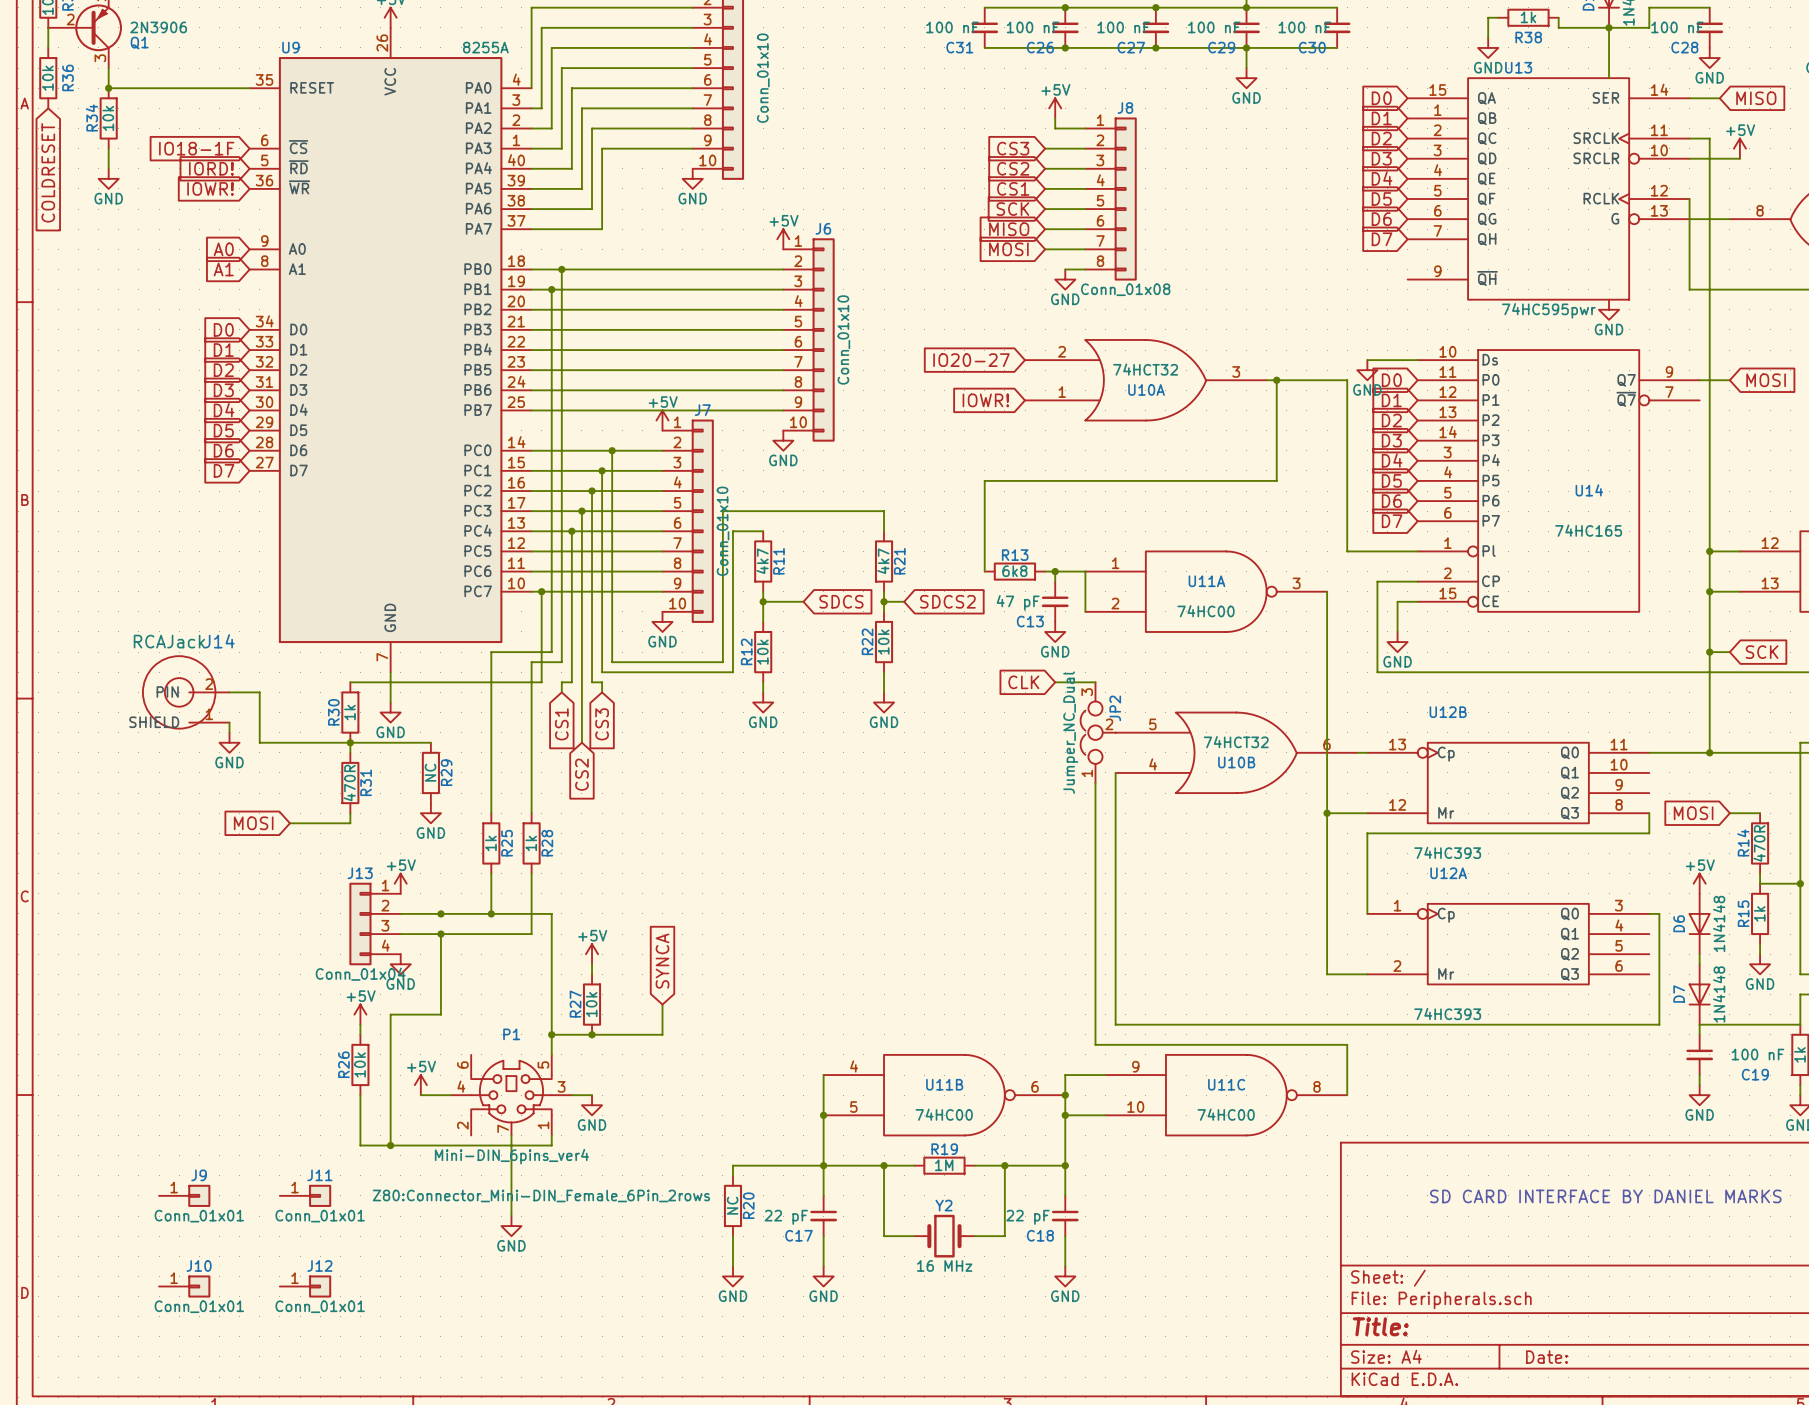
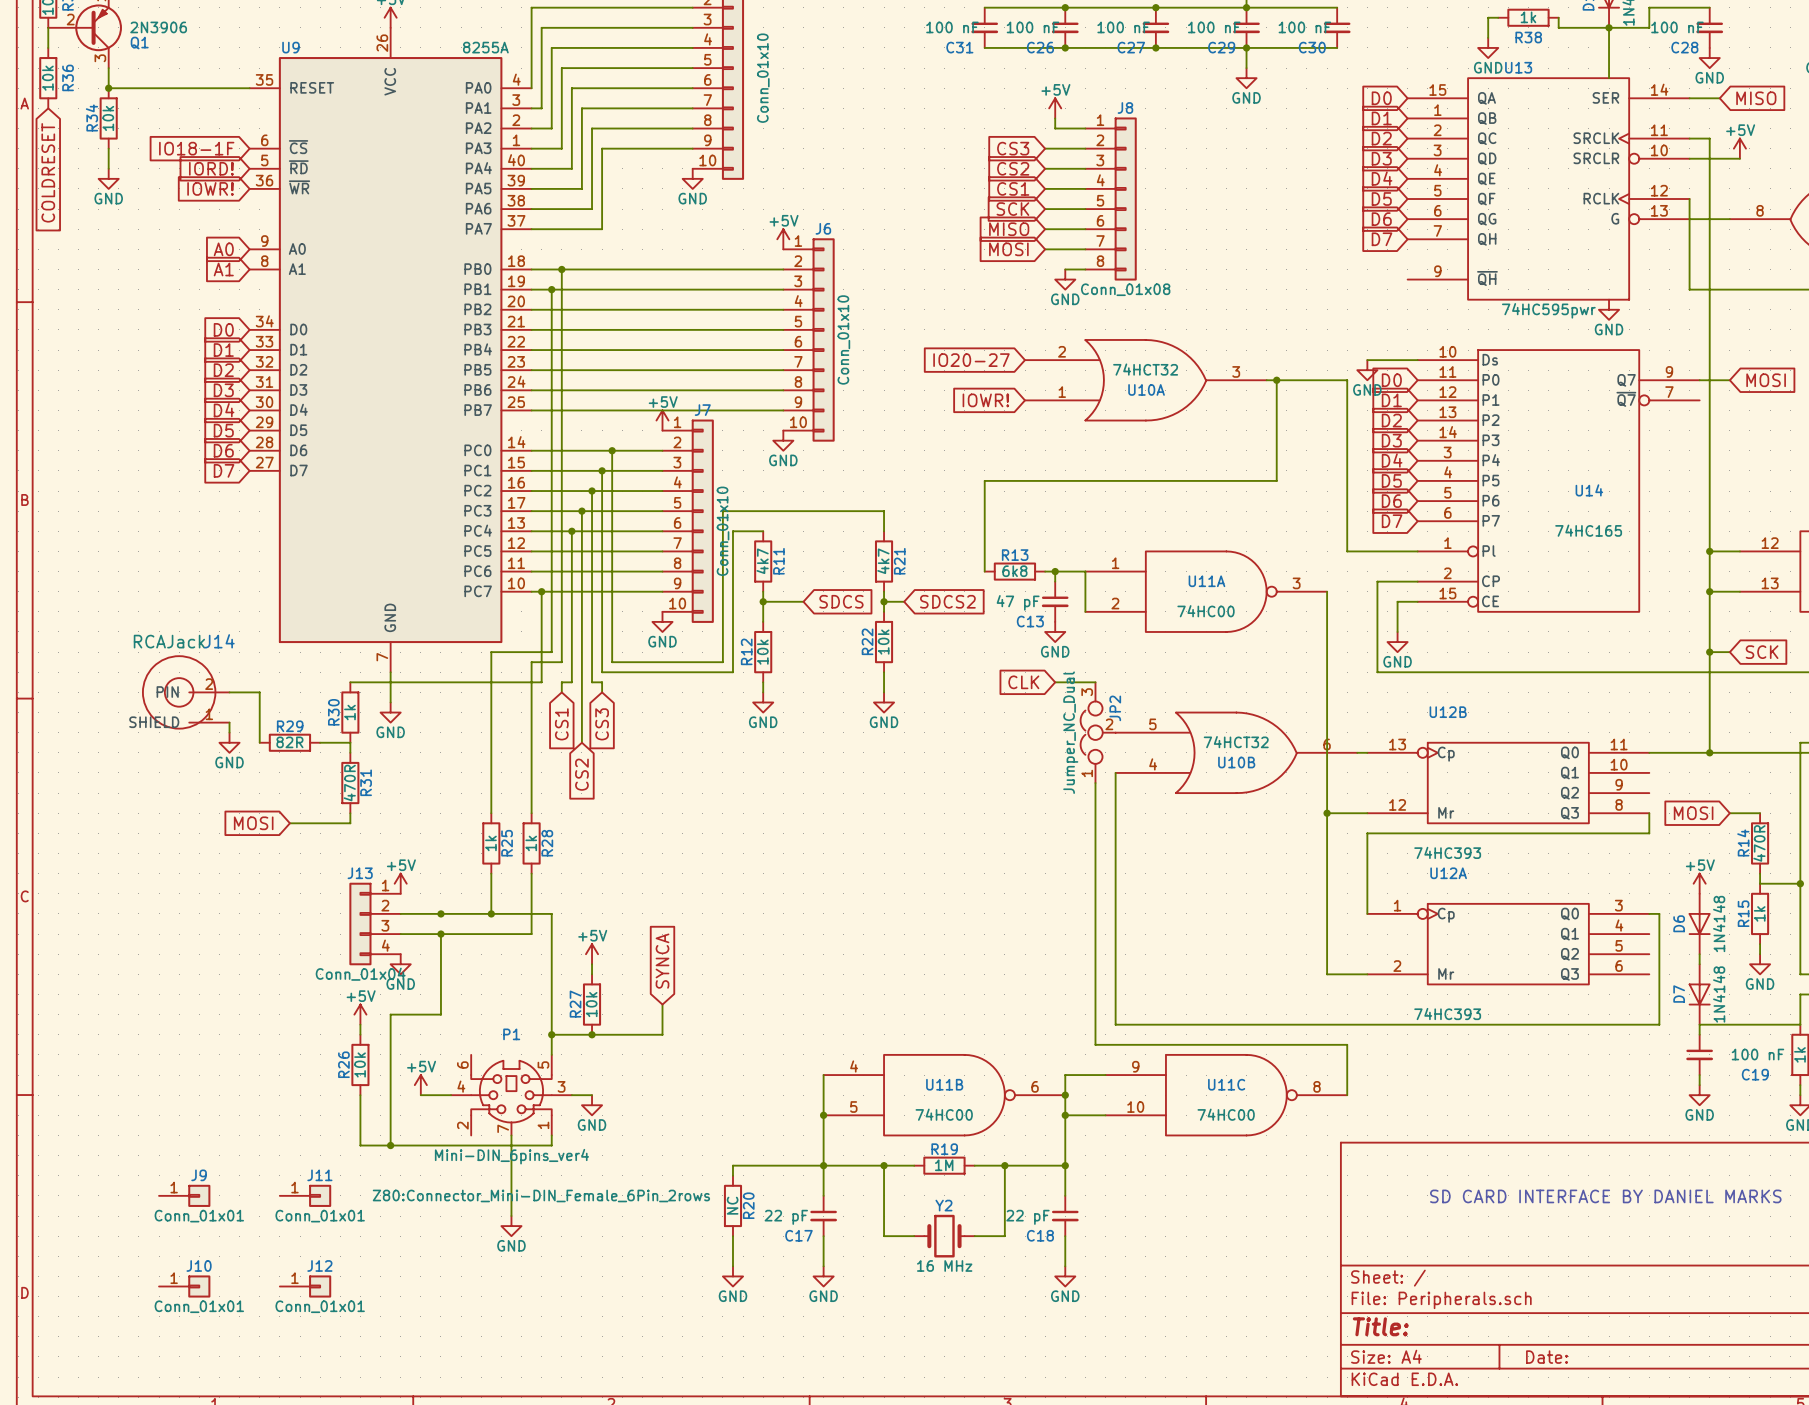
wire: (350, 742) (430, 742) -> none
junction: (350, 742) -> none
R29 rotation: 0° (430, 772) -> 90° clockwise (289, 742)
R29 position: (430, 772) -> (289, 742)
R29 value: NC (430, 772) -> 82R (289, 742)
R29 name position: R29 (446, 772) -> R29 (290, 726)
power symbol: GND (430, 813) -> none

